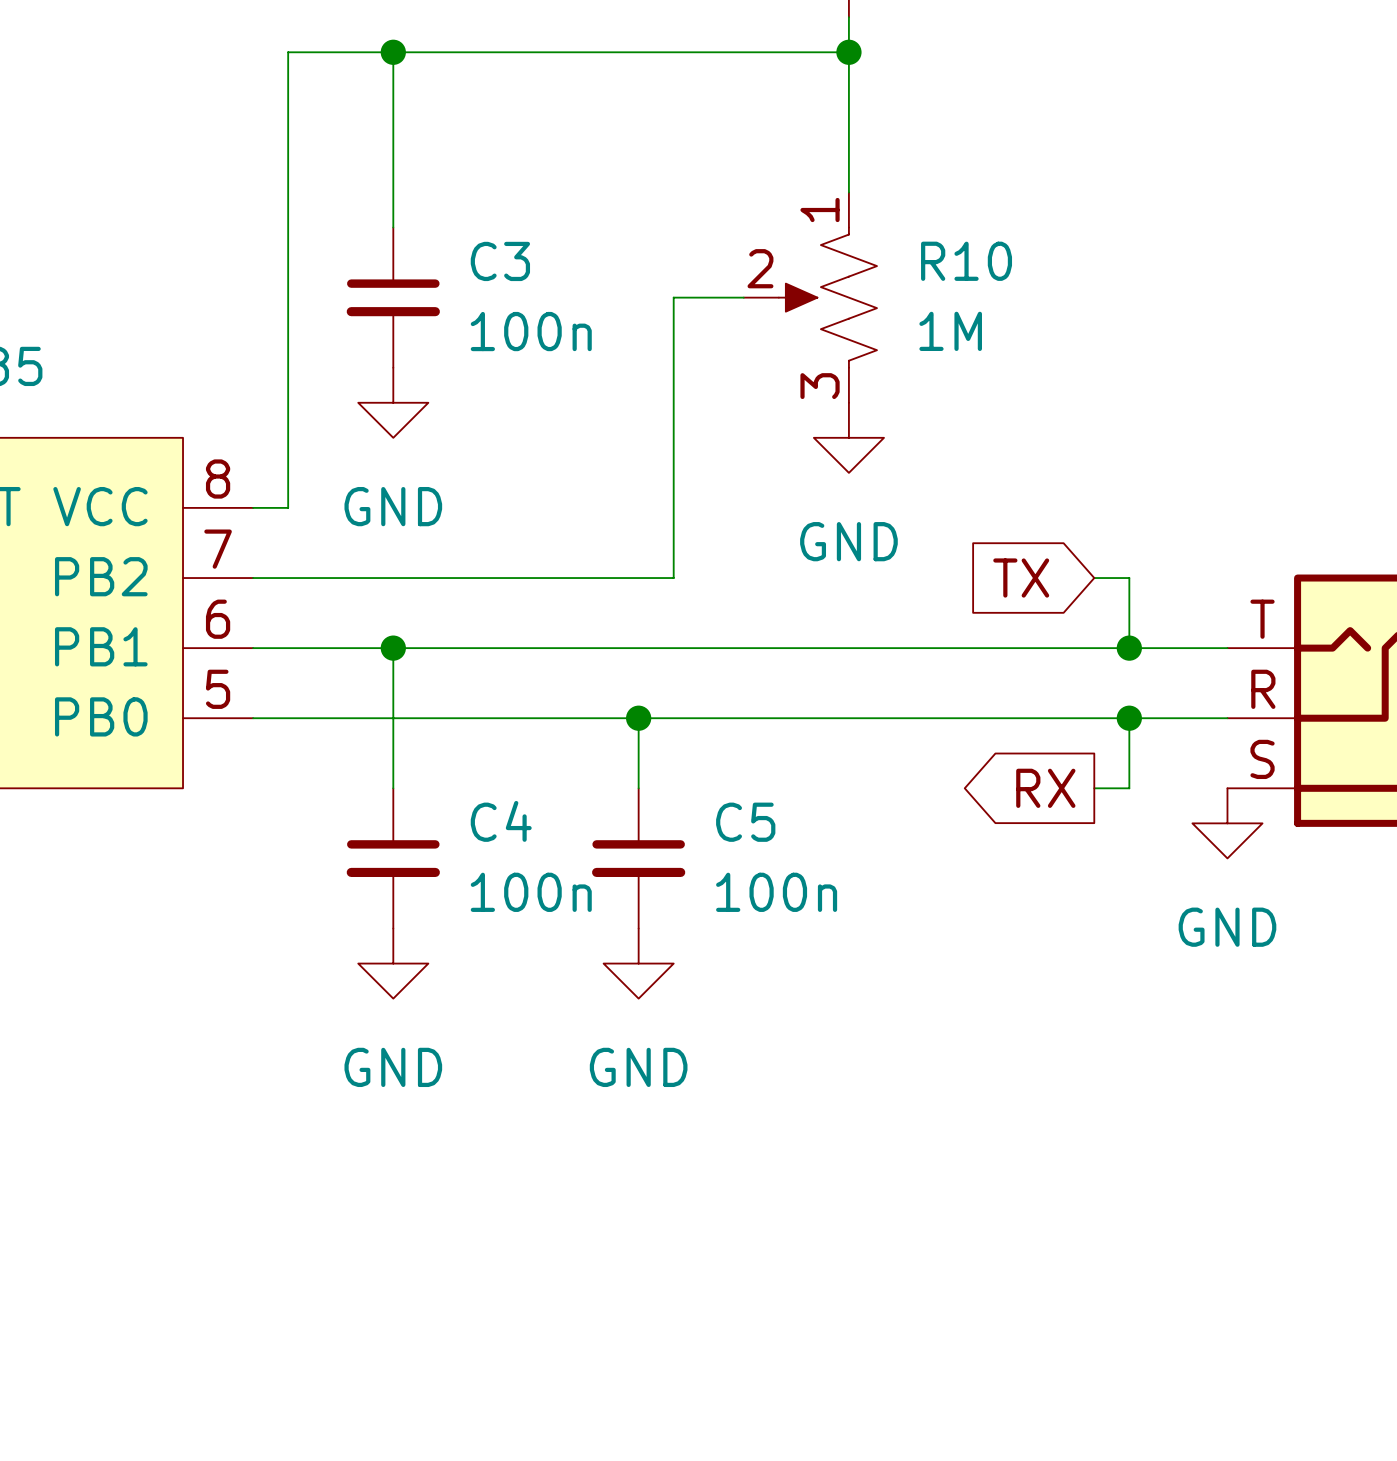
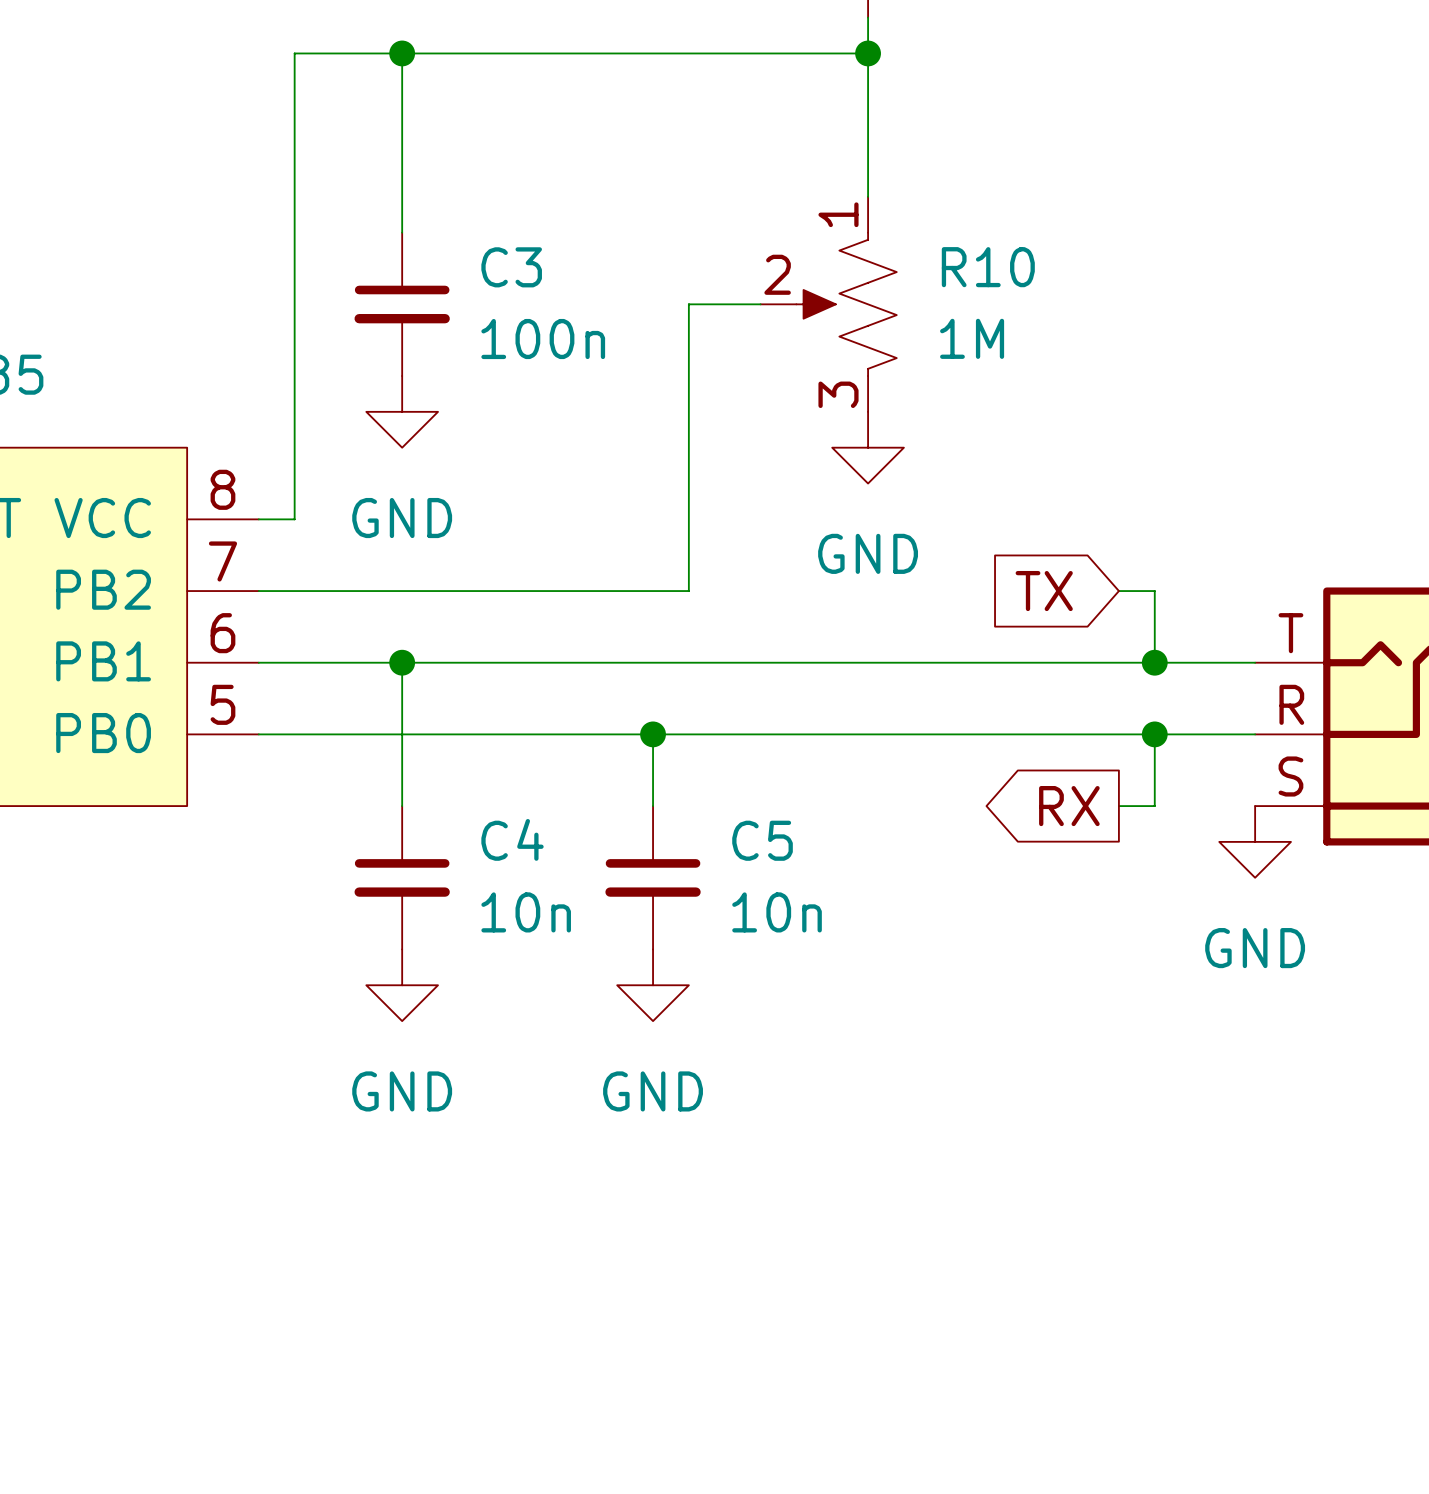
C4 value: 100n (531, 892) -> 10n (526, 912)
C5 value: 100n (776, 892) -> 10n (777, 912)

